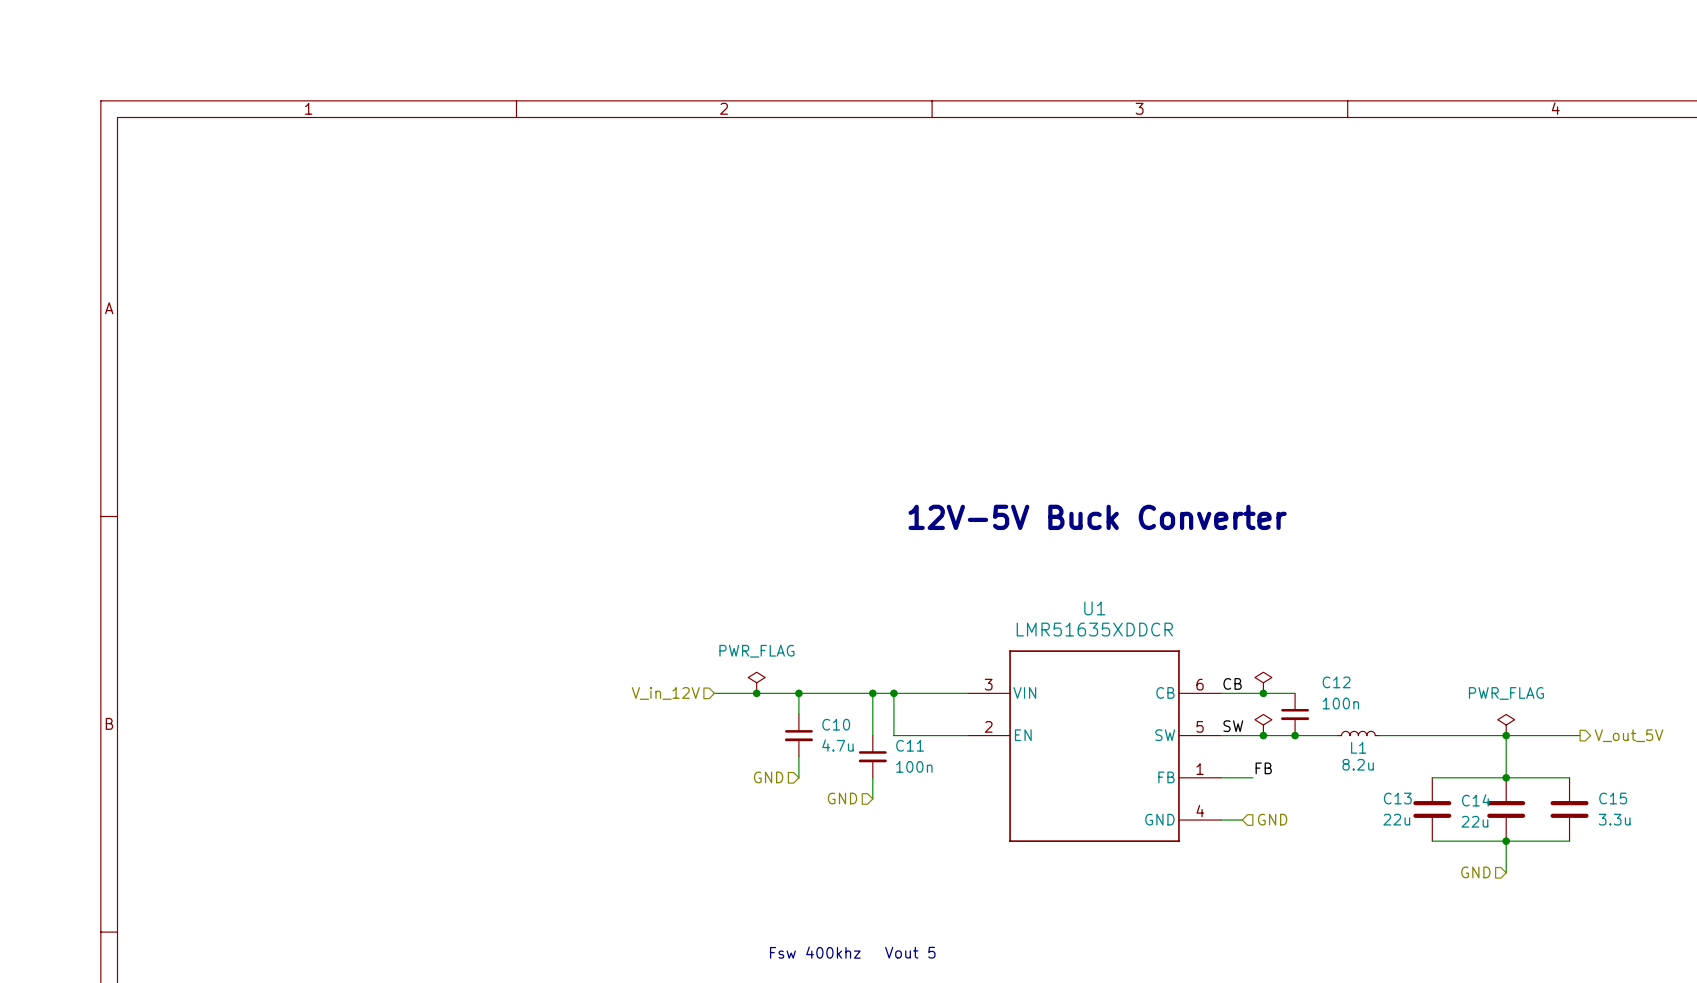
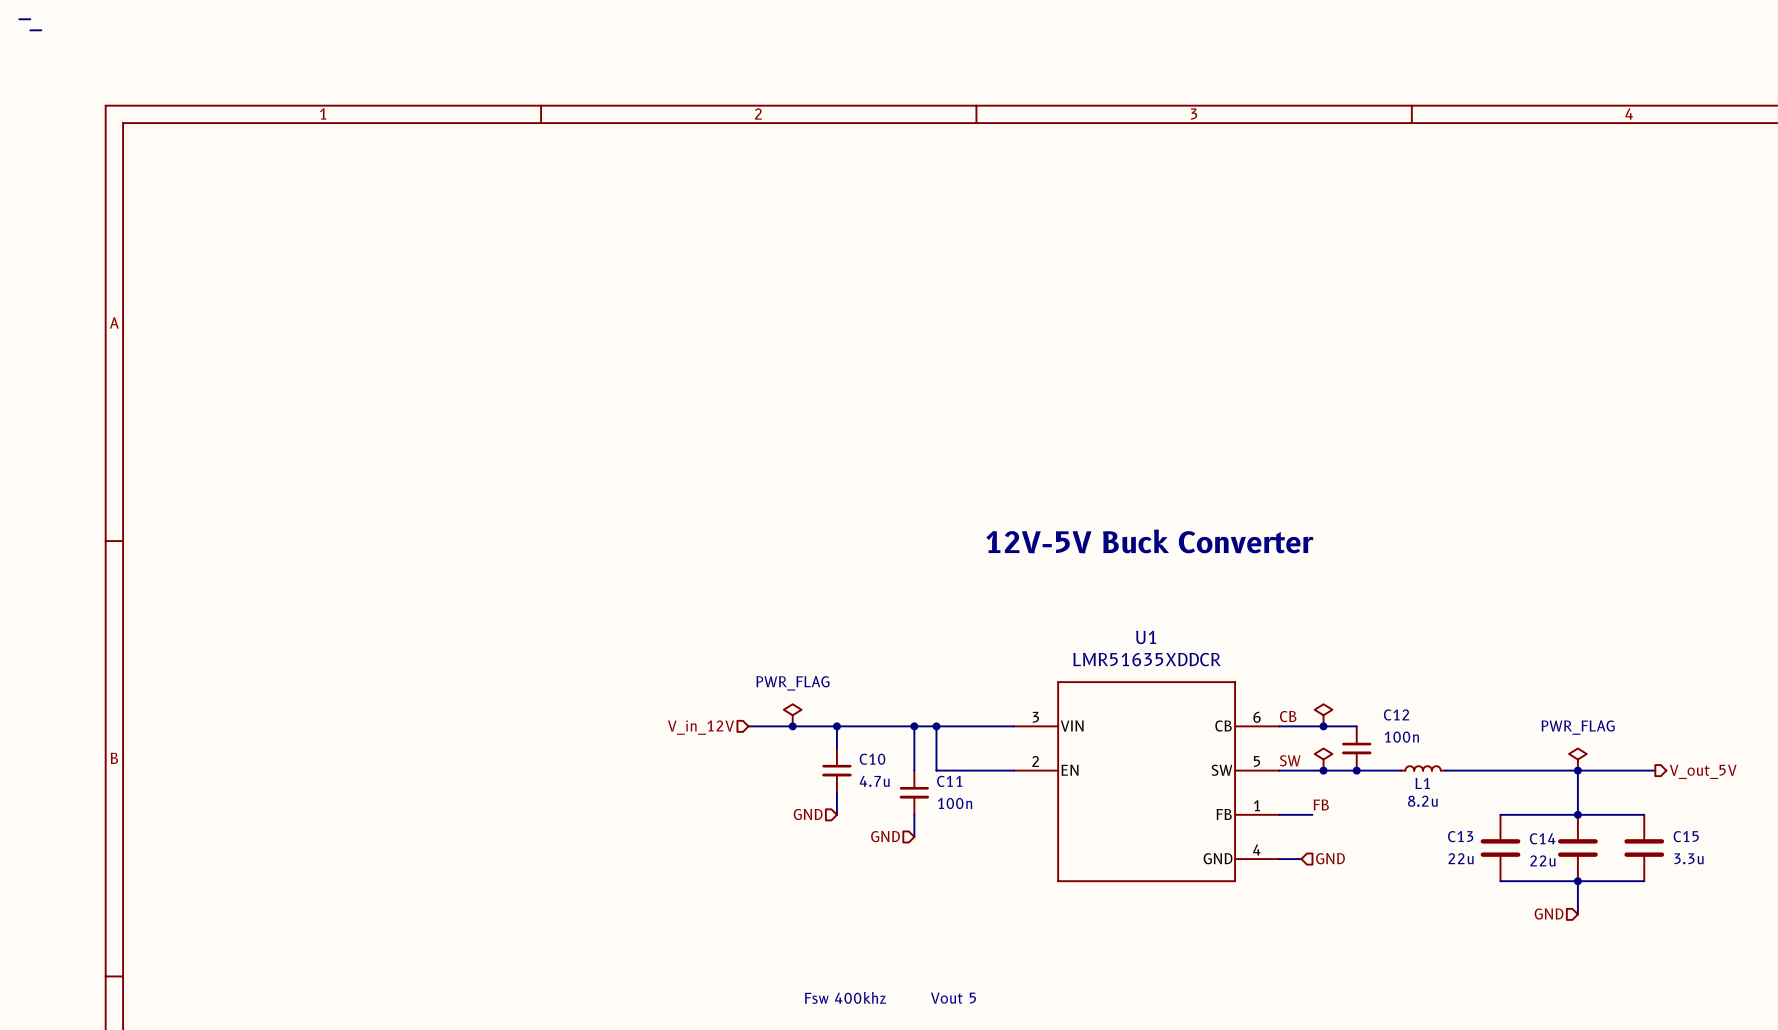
wire: none -> (19, 19) (30, 19)
wire: none -> (30, 30) (41, 30)

